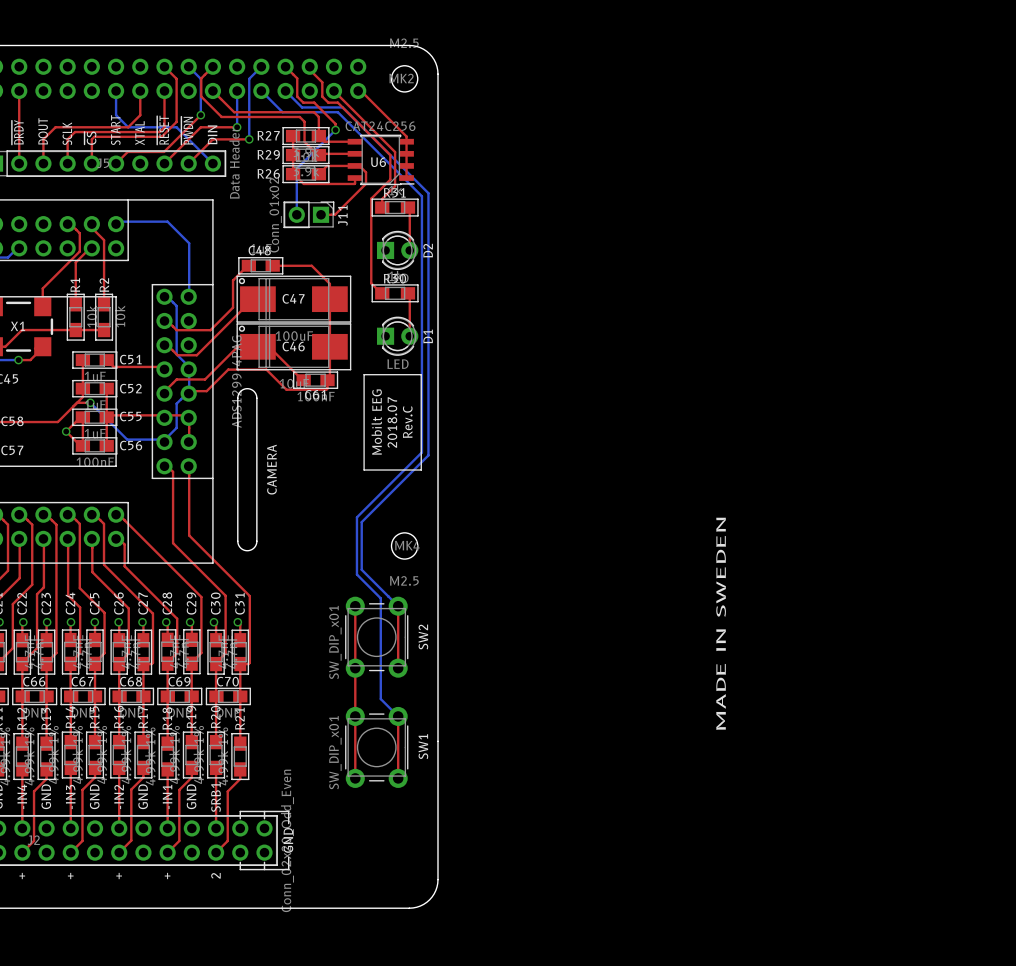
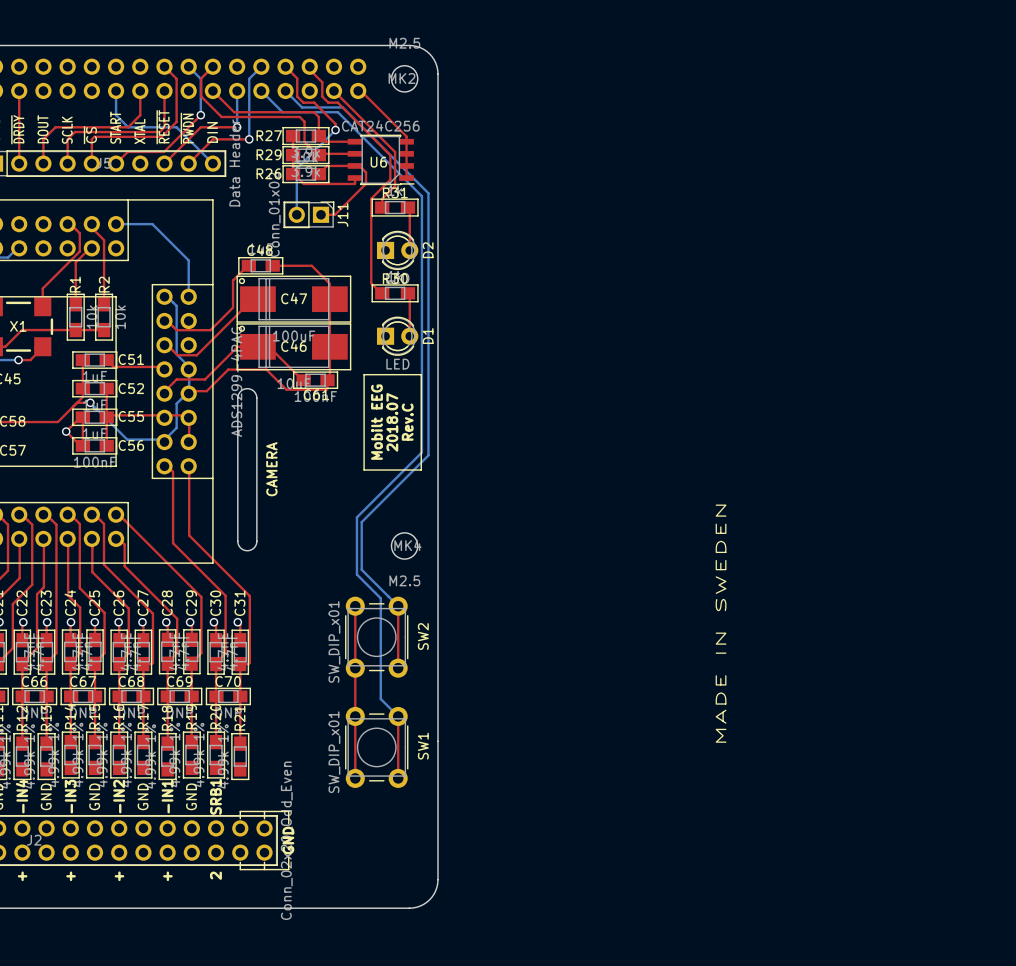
bottom track: (116, 221) (167, 221) (189, 243) (189, 294) -> none
bottom track: none -> (116, 224) (152, 224) (188, 260) (188, 296)
top track: (70, 767) (70, 828) -> none
top track: (95, 767) (95, 777) (82, 789) (82, 840) (70, 852) -> none
top track: (119, 767) (119, 828) -> none
top track: (143, 767) (143, 777) (131, 789) (131, 840) (119, 852) -> none
top track: (191, 767) (191, 777) (179, 789) (179, 840) (167, 852) -> none
top track: (216, 767) (216, 828) -> none
top track: (22, 769) (22, 828) -> none
top track: (46, 769) (46, 778) (34, 791) (34, 840) (22, 852) -> none
top track: (167, 769) (167, 828) -> none
top track: (240, 769) (240, 778) (227, 791) (227, 840) (216, 852) -> none

